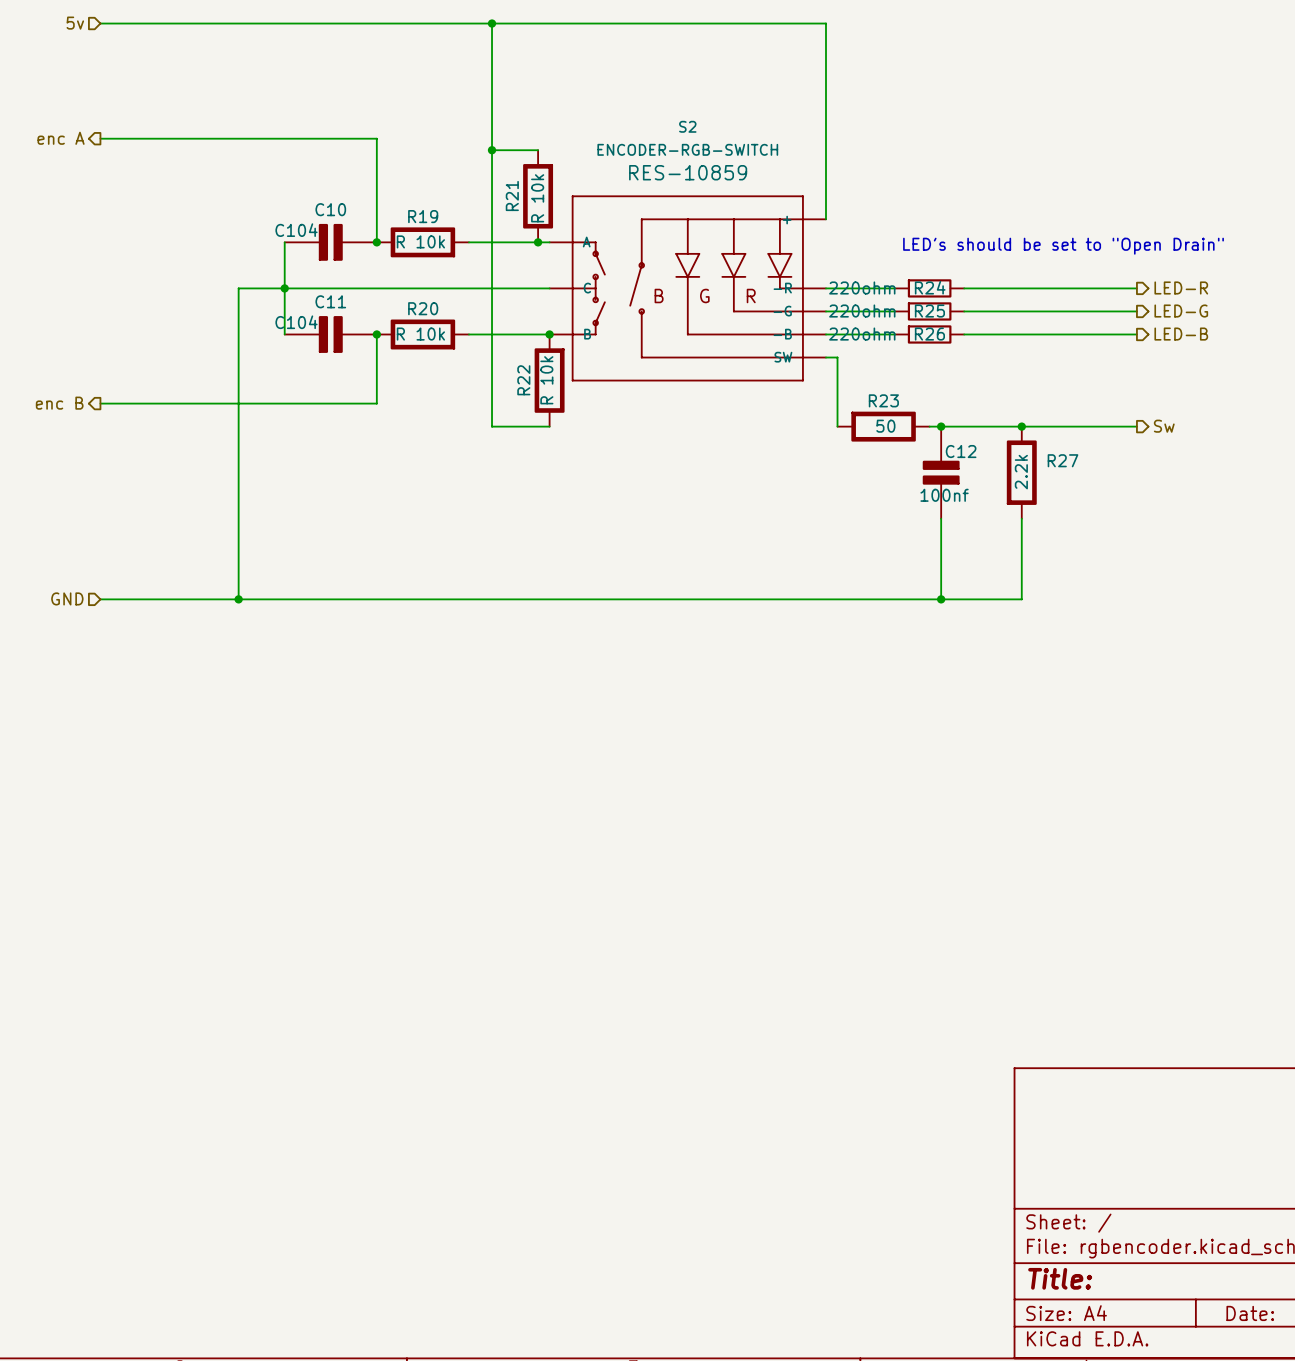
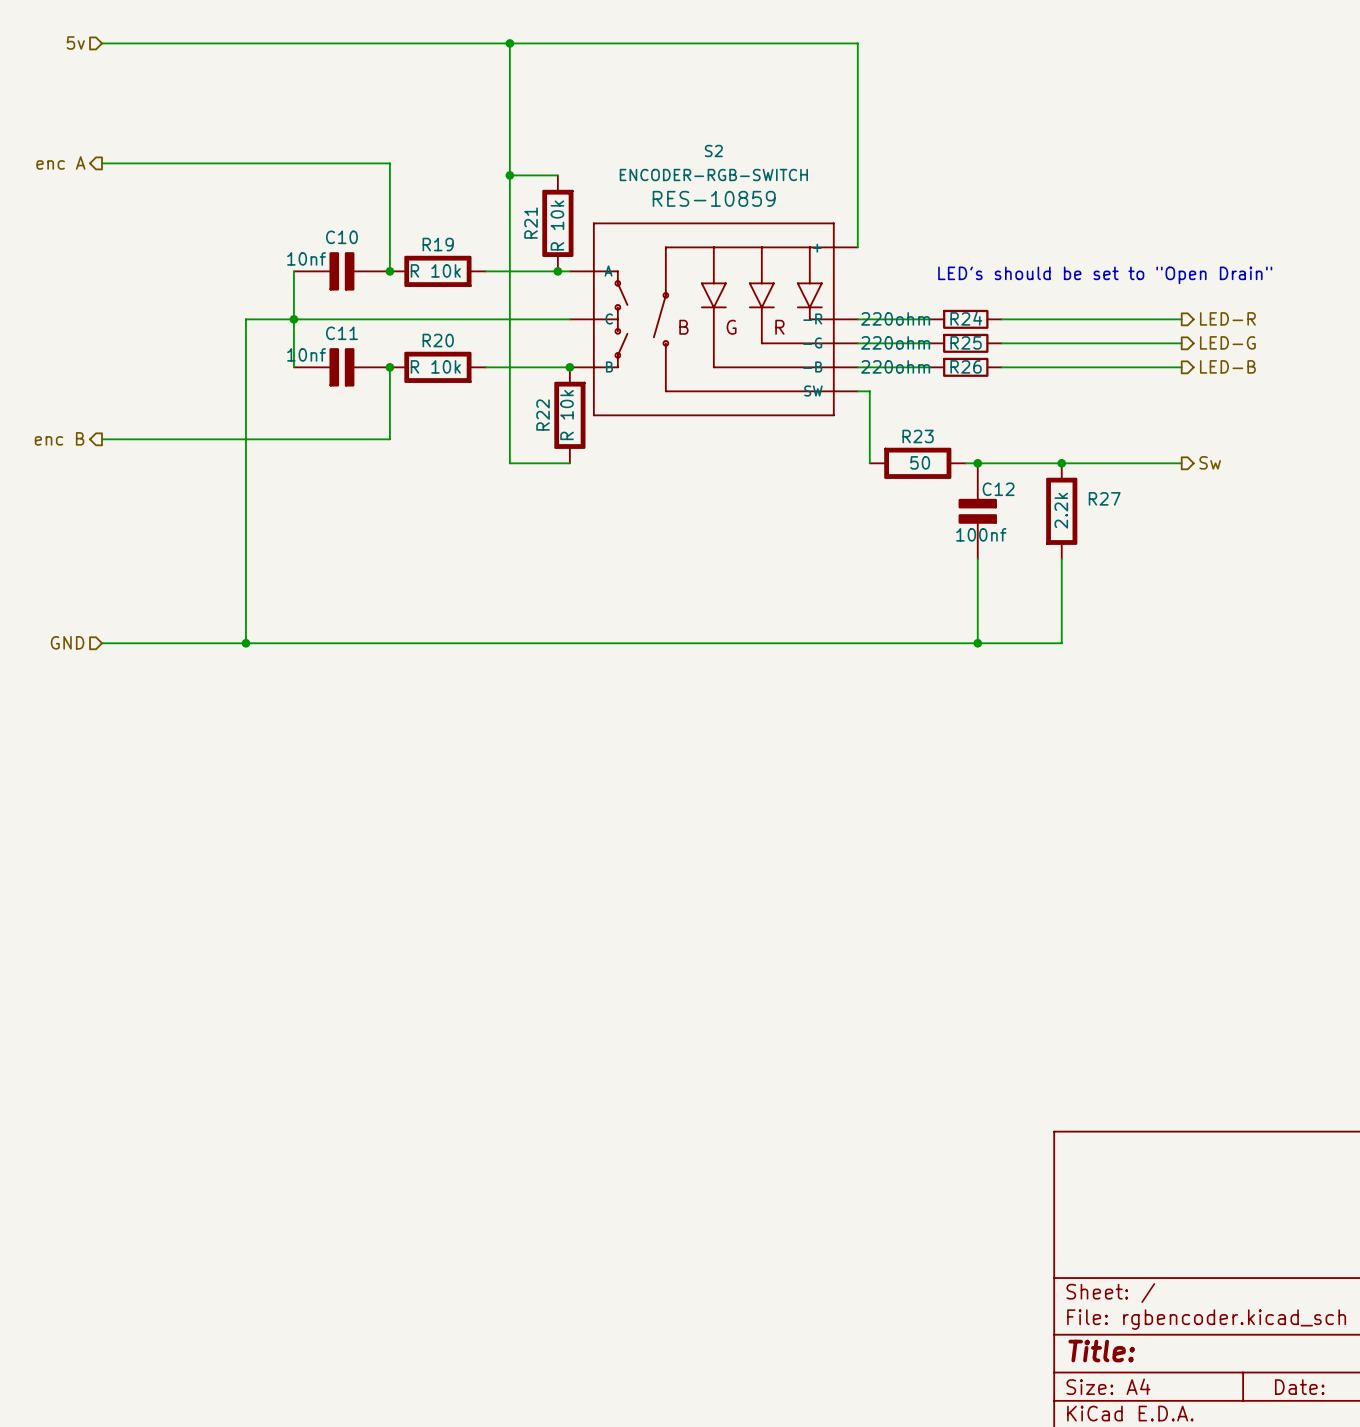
C10 value: C104 (296, 230) -> 10nf (306, 258)
C11 value: C104 (296, 322) -> 10nf (306, 354)

